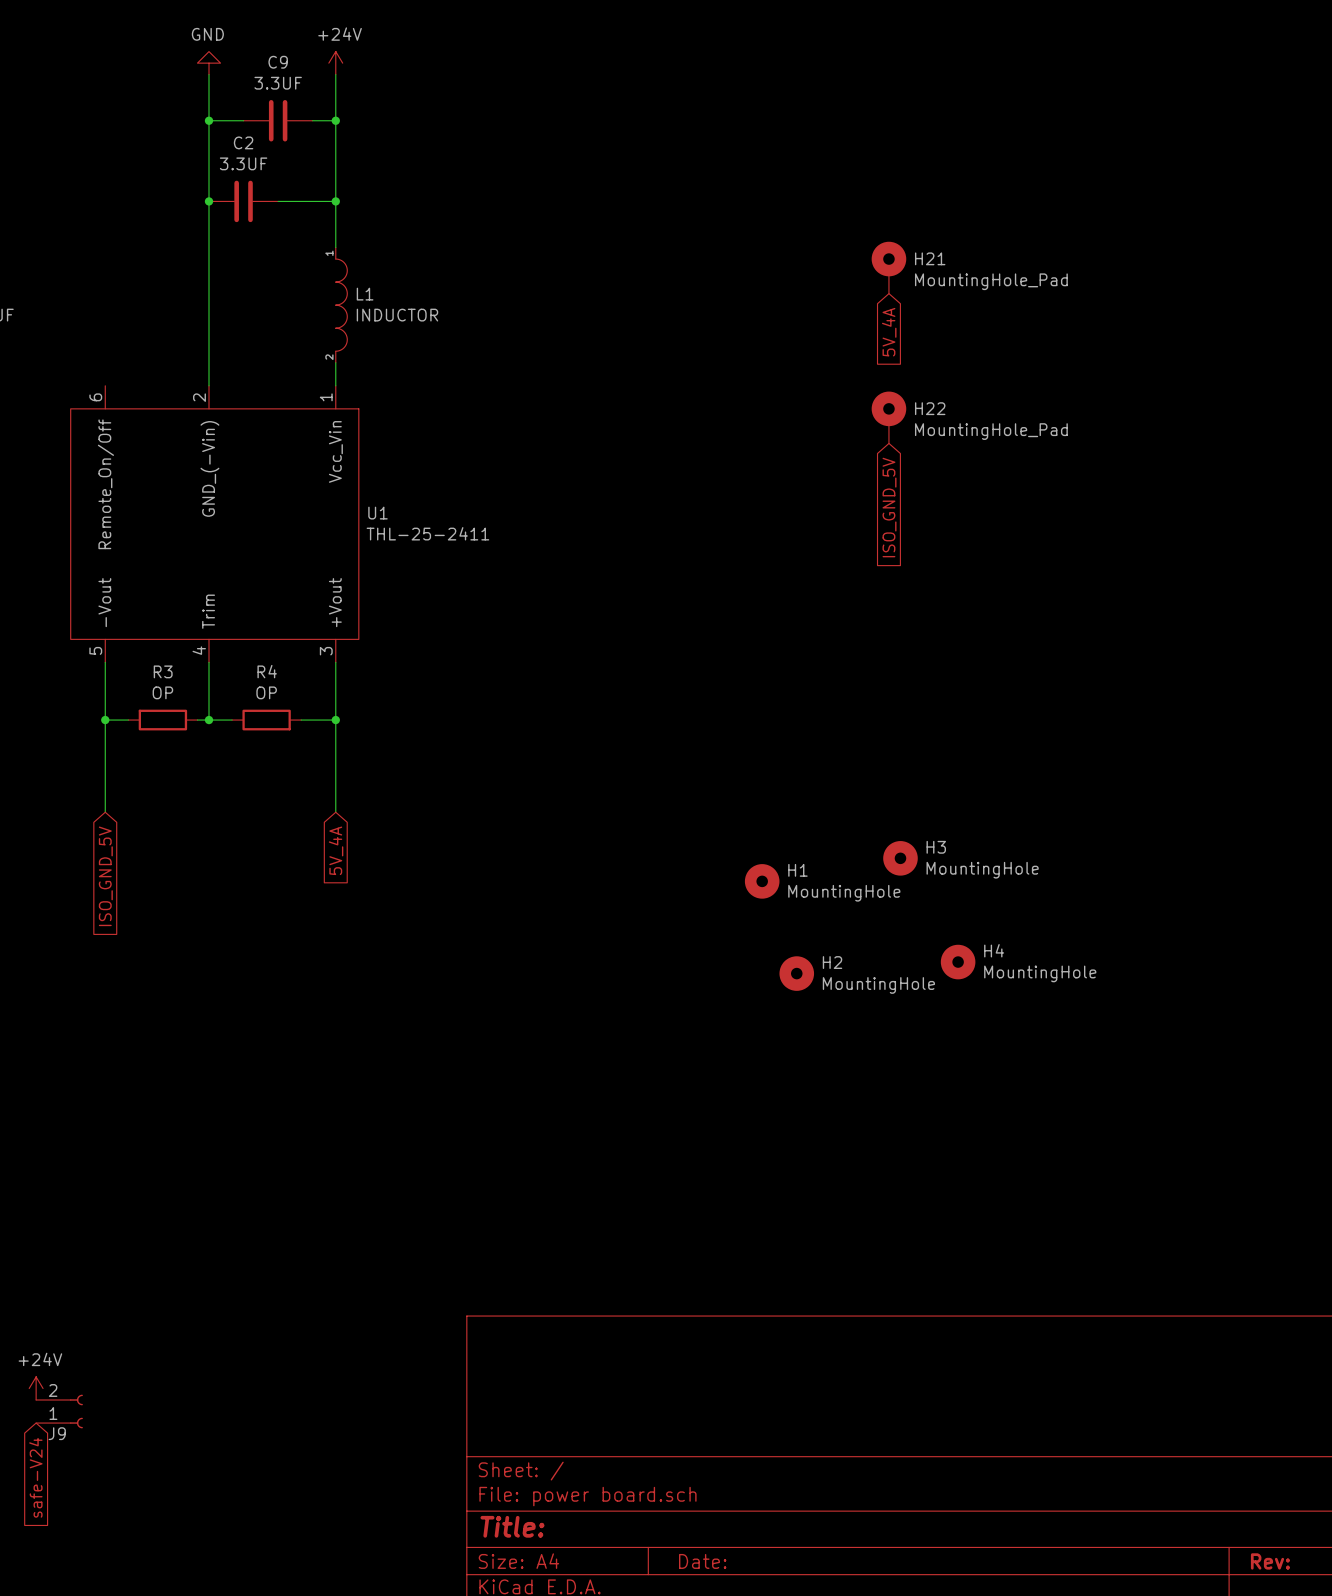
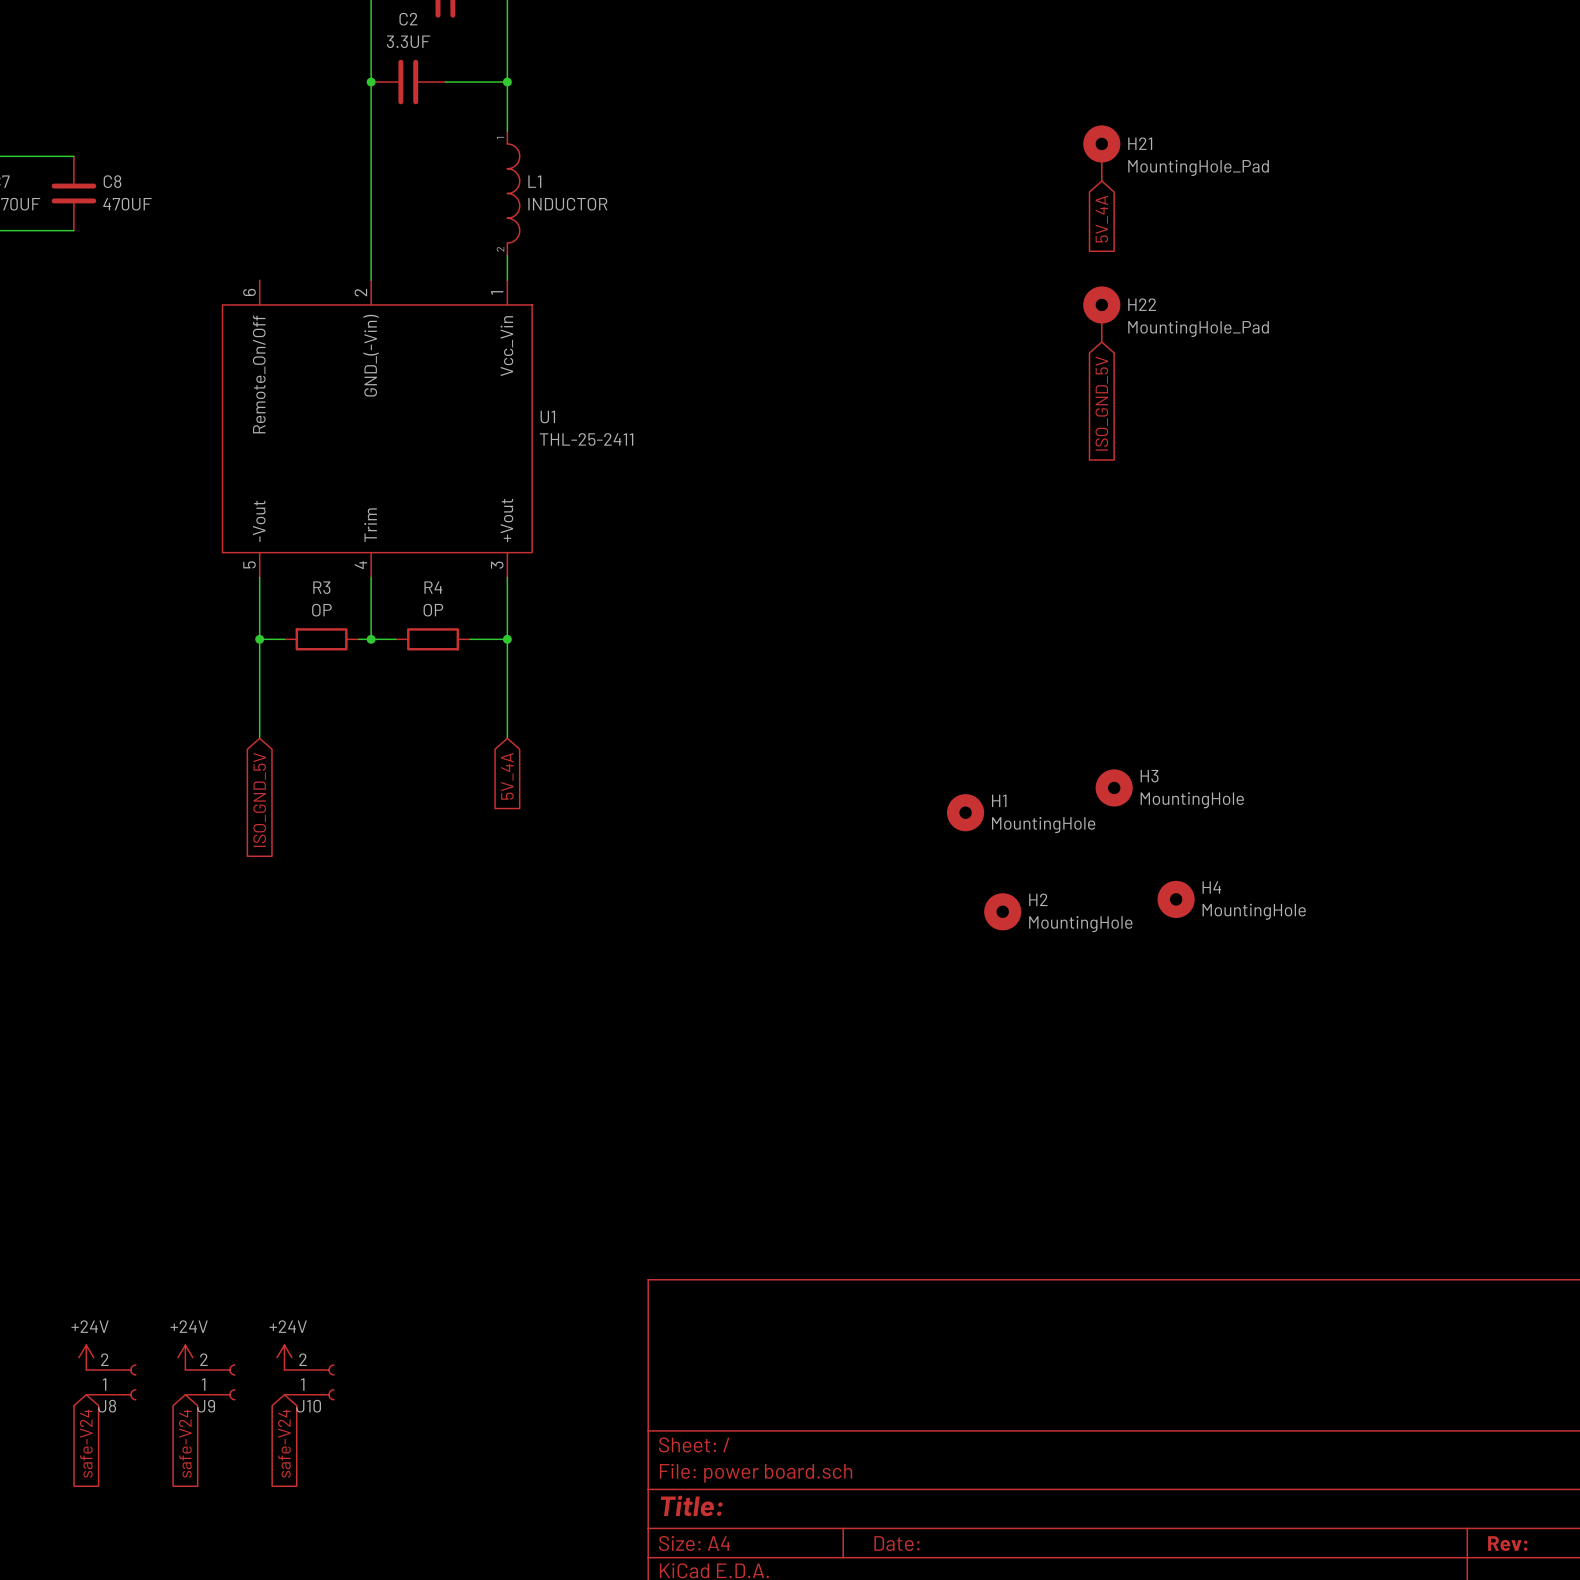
power symbol: none -> +24V (284, 1357)
J10: none -> (309, 1382)
global label: none -> safe-V24 (284, 1443)

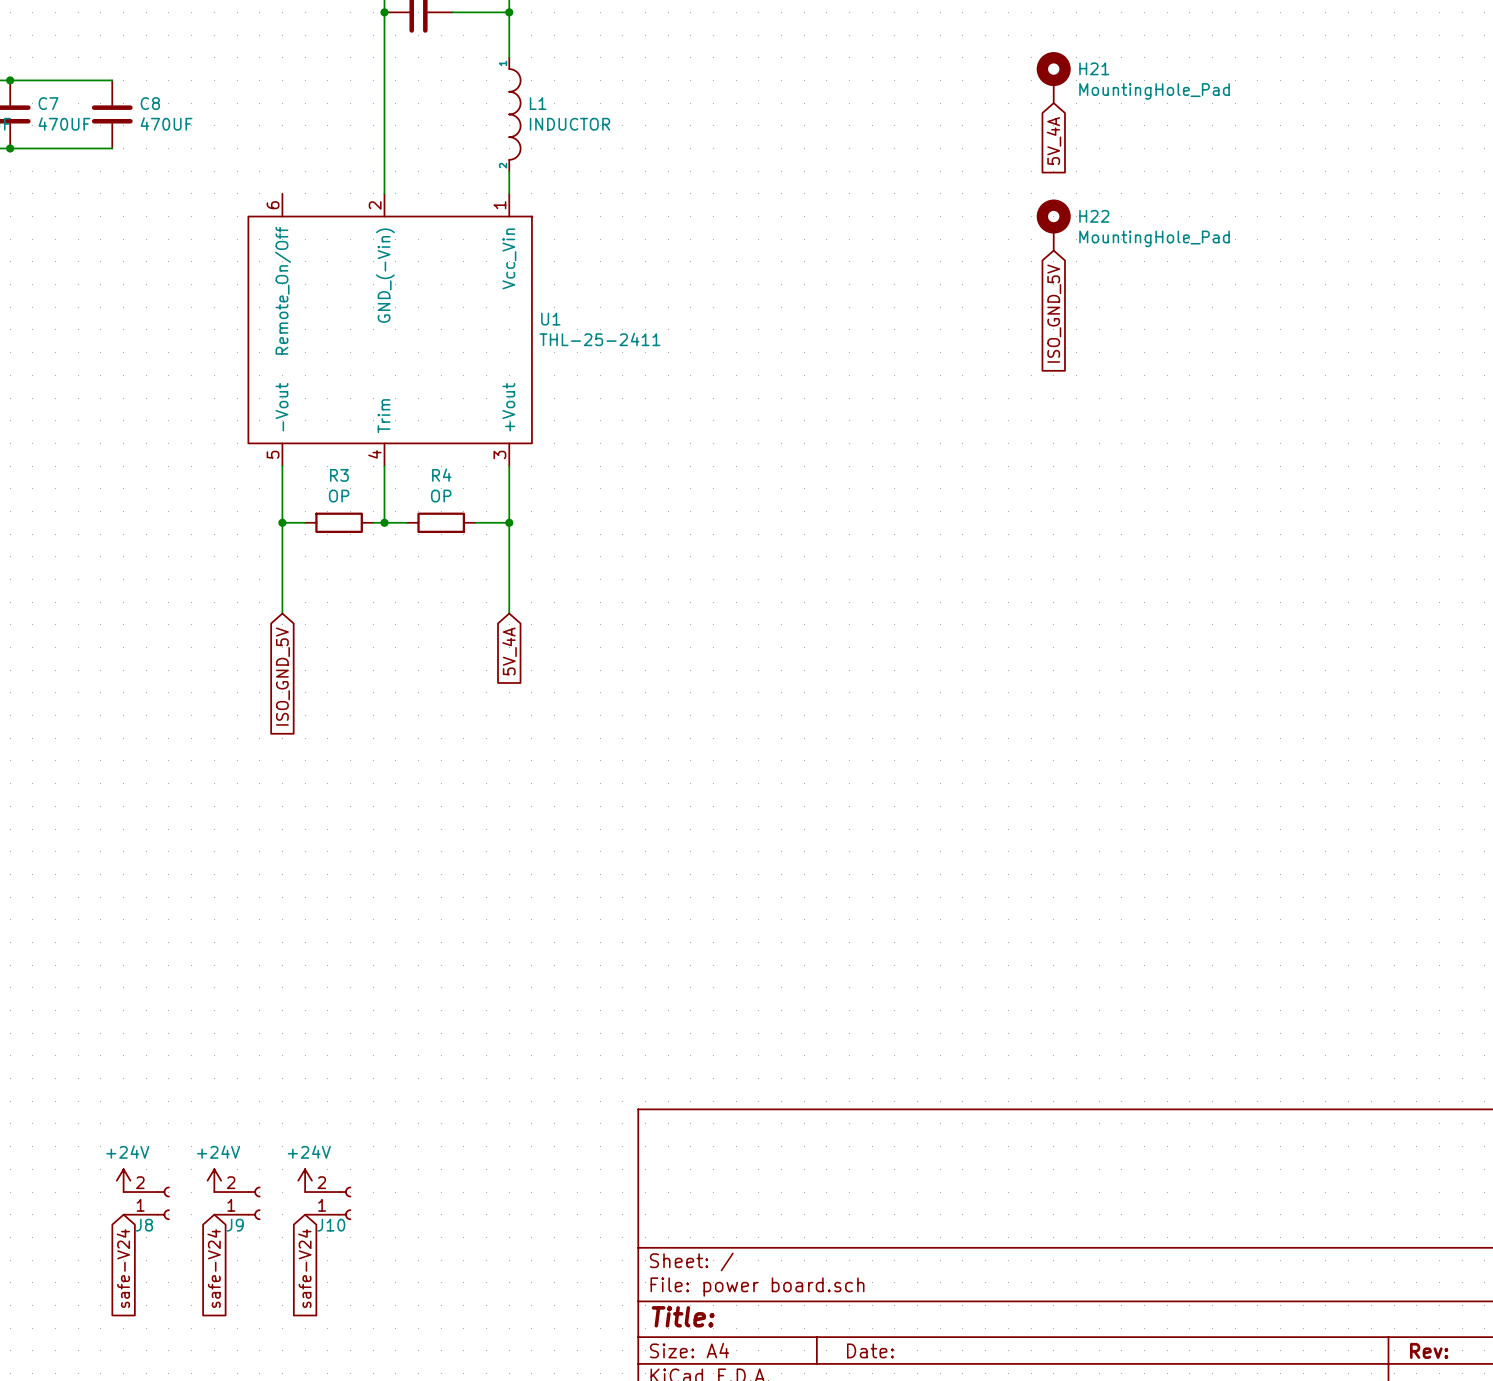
H3: MountingHole (1114, 787) -> none
H1: MountingHole (965, 812) -> none
H4: MountingHole (1176, 899) -> none
H2: MountingHole (1002, 911) -> none

